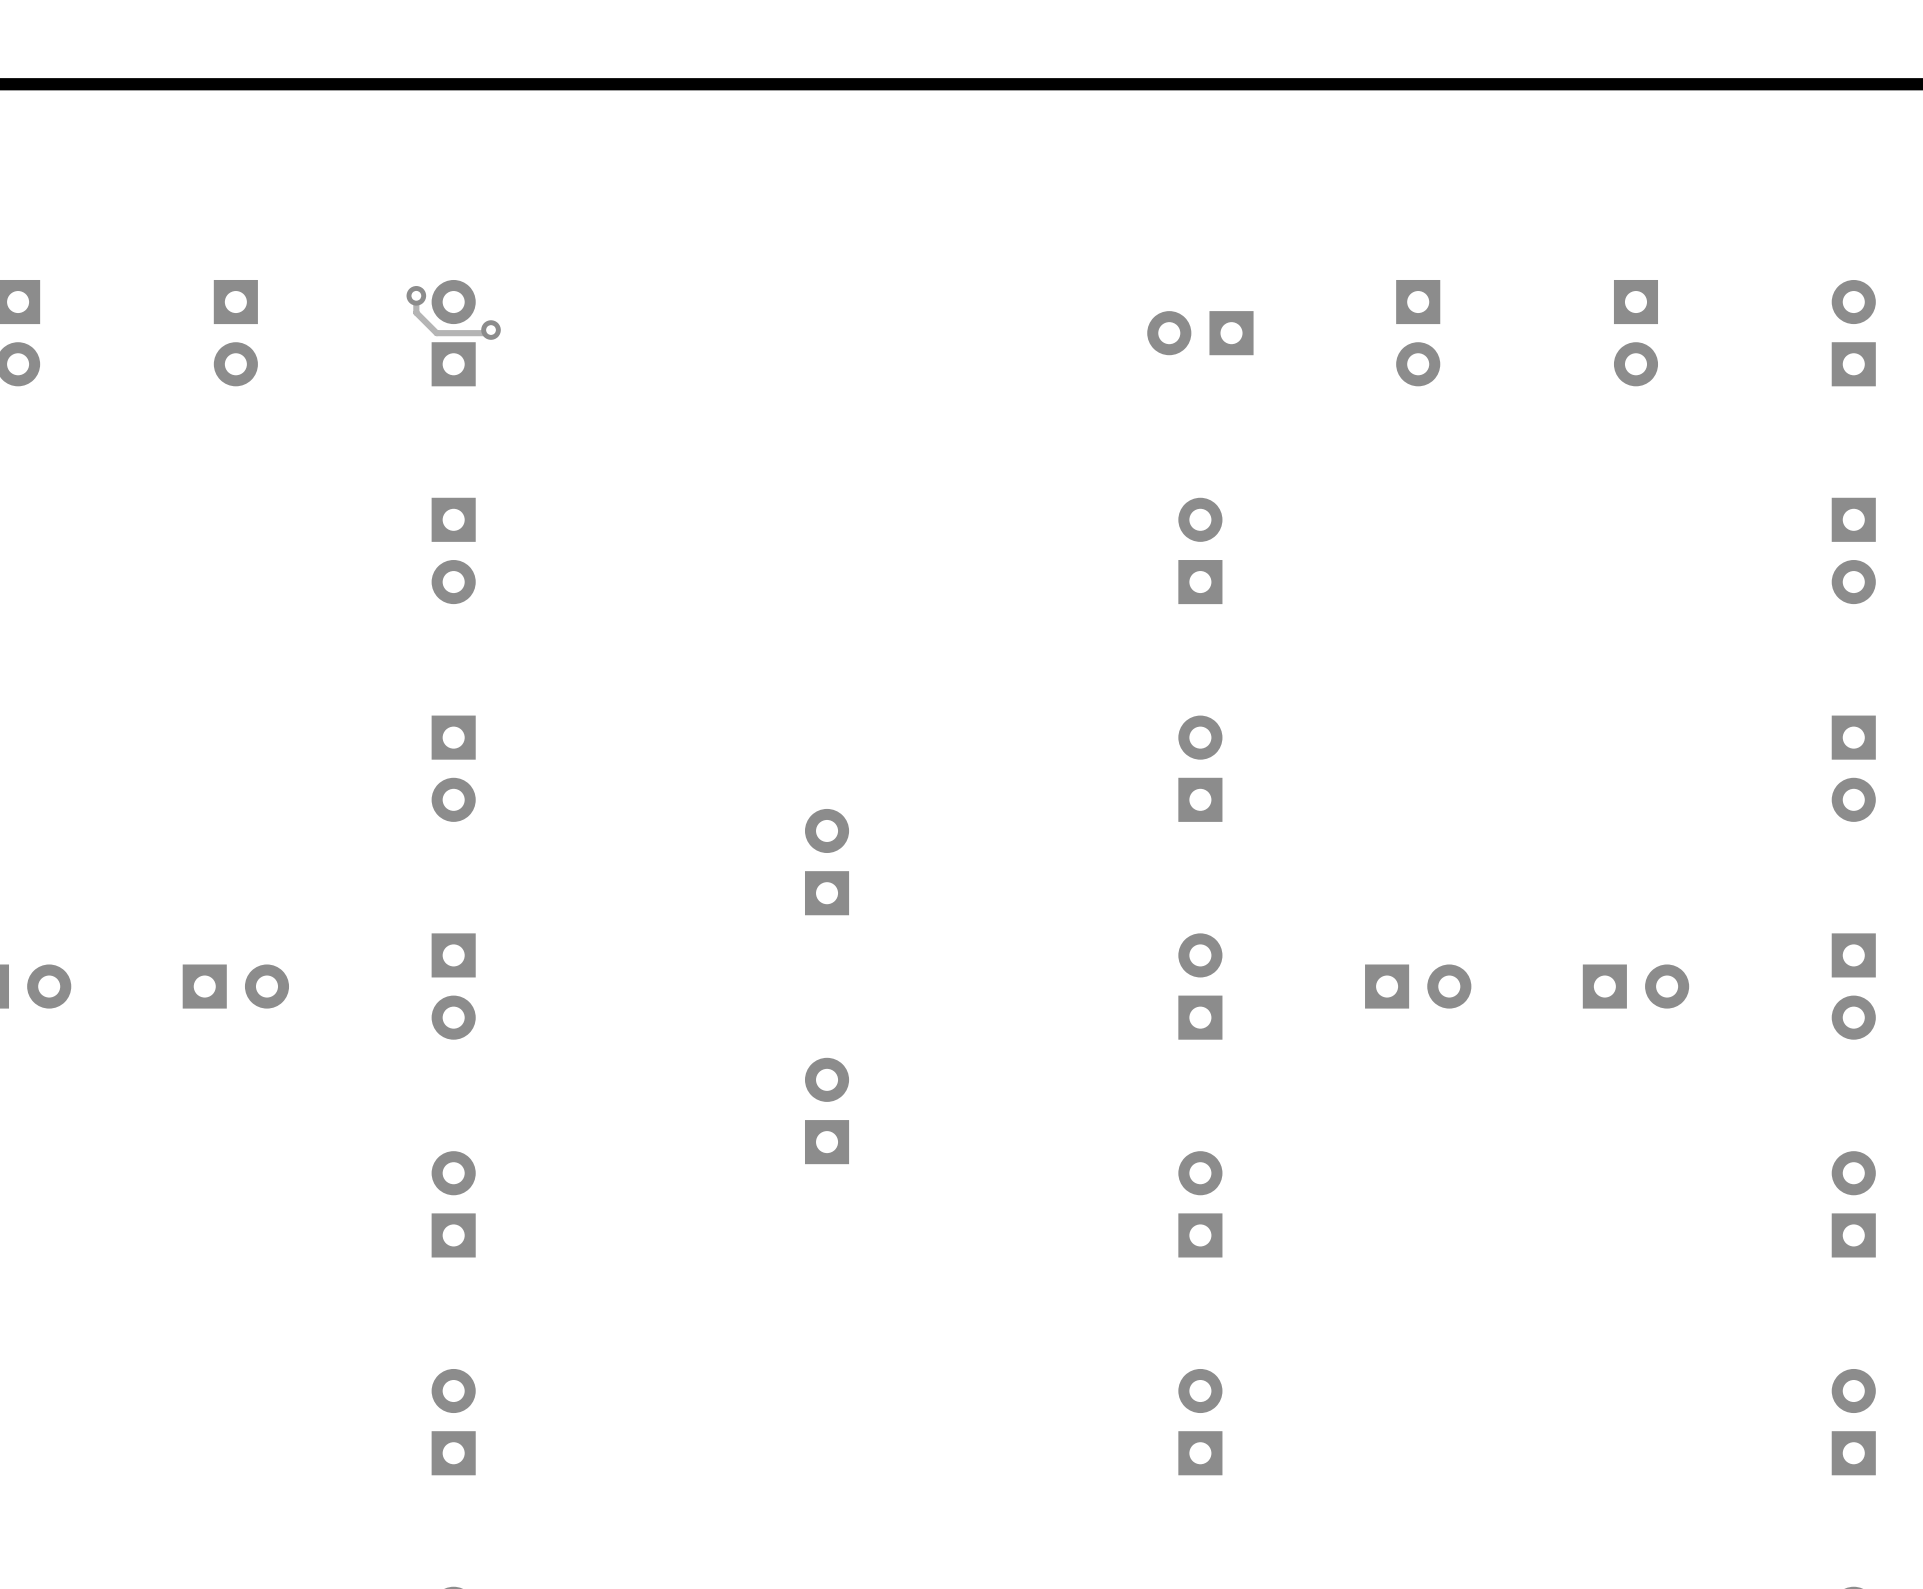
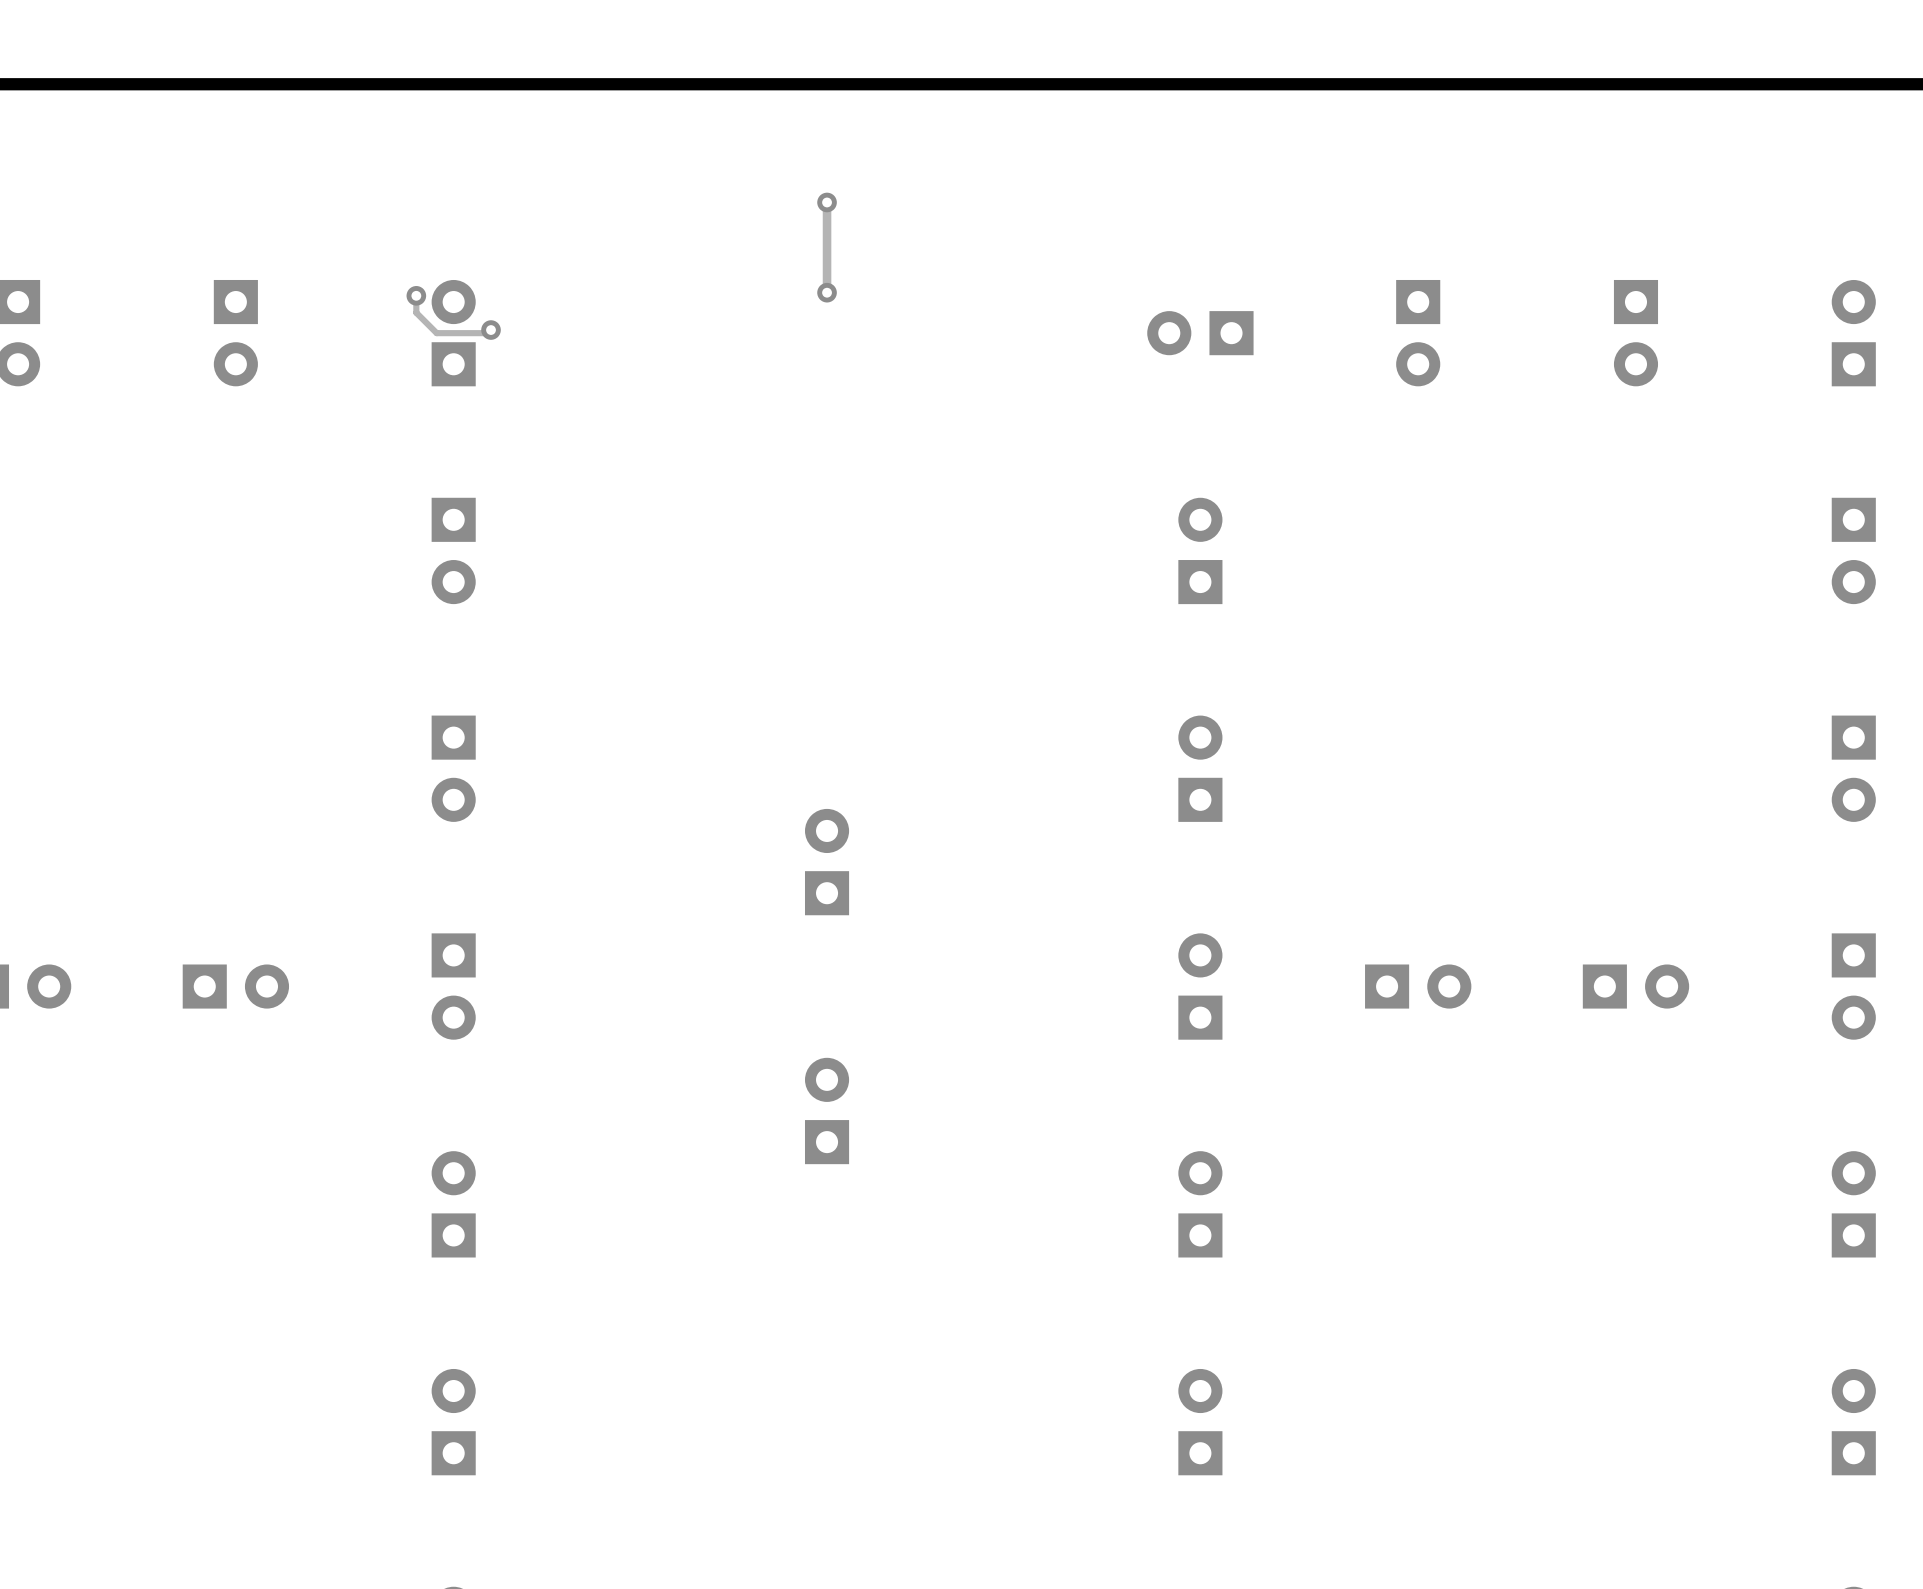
track: none -> (827, 202) (827, 292)
via: none -> (827, 202)
via: none -> (827, 292)

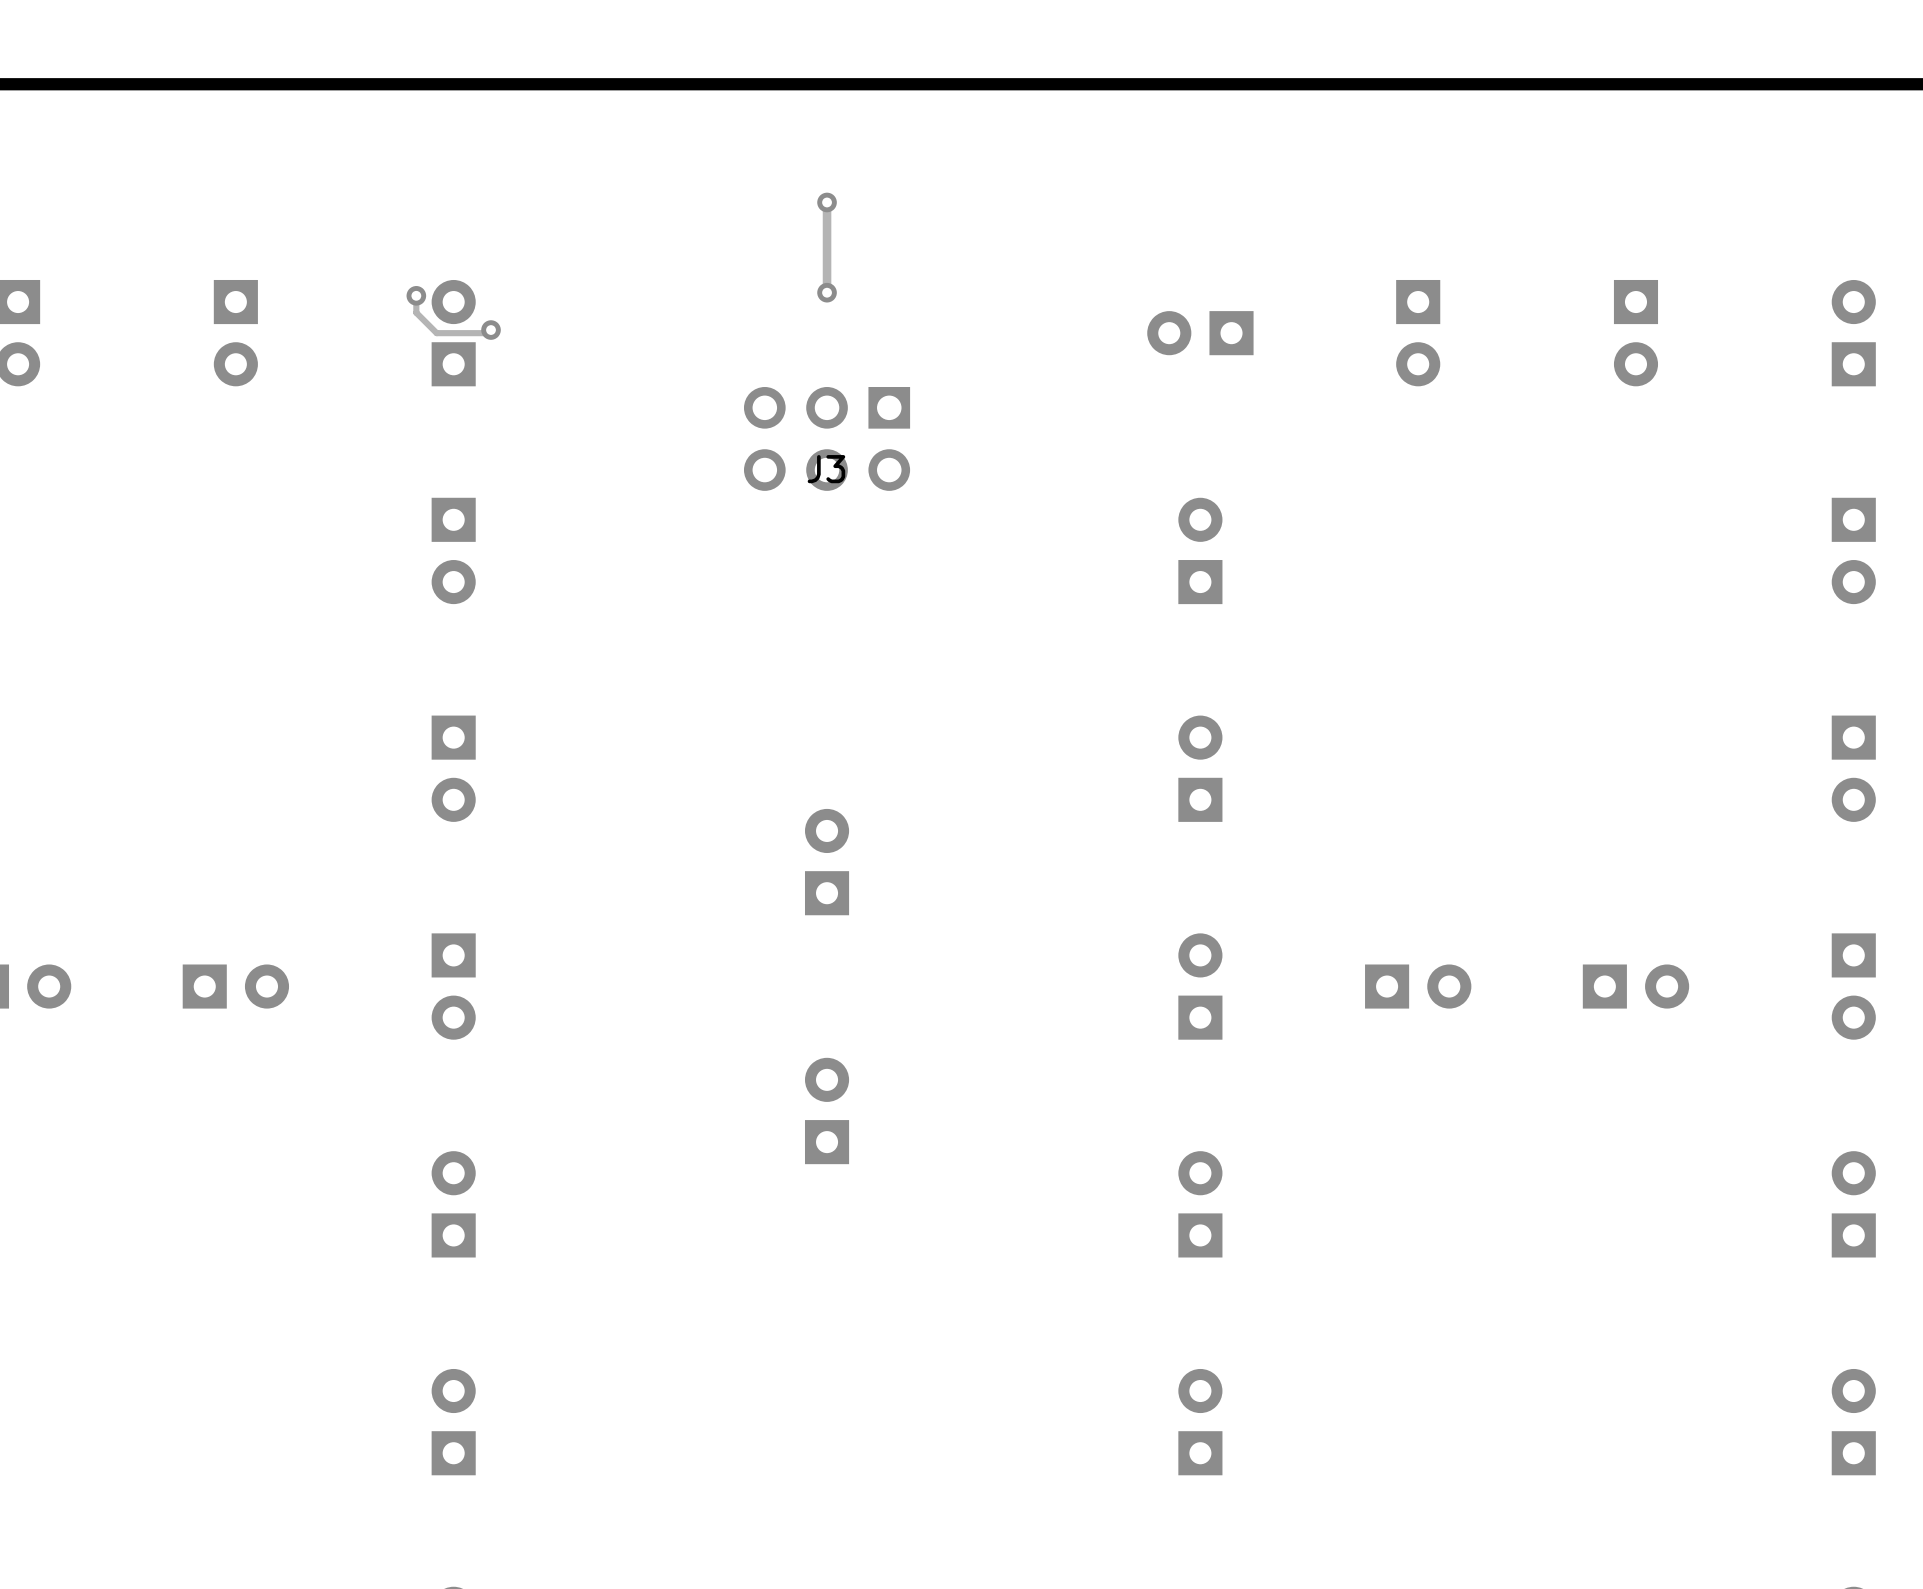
J3: none -> (827, 438)

